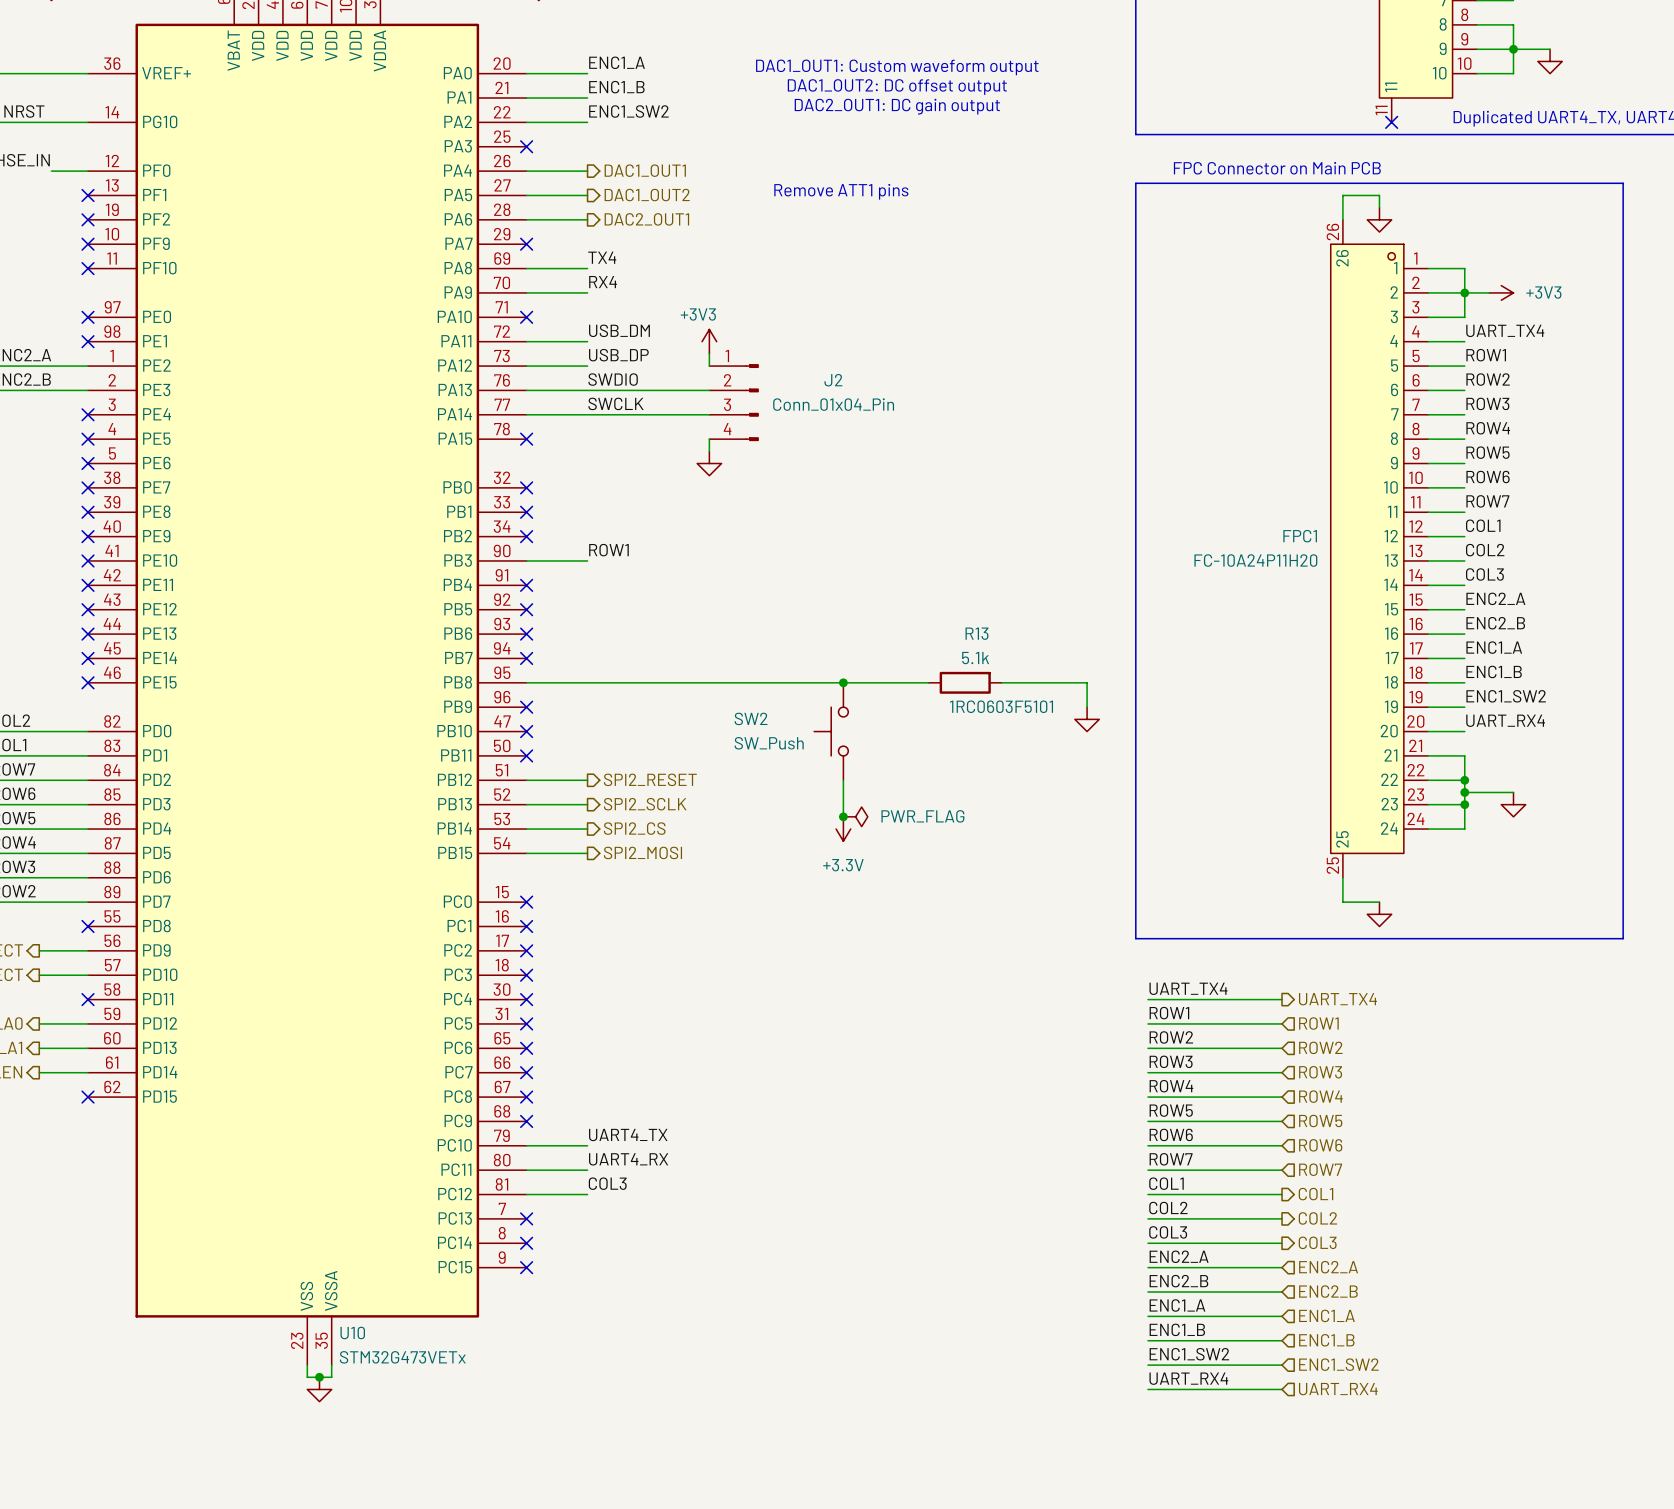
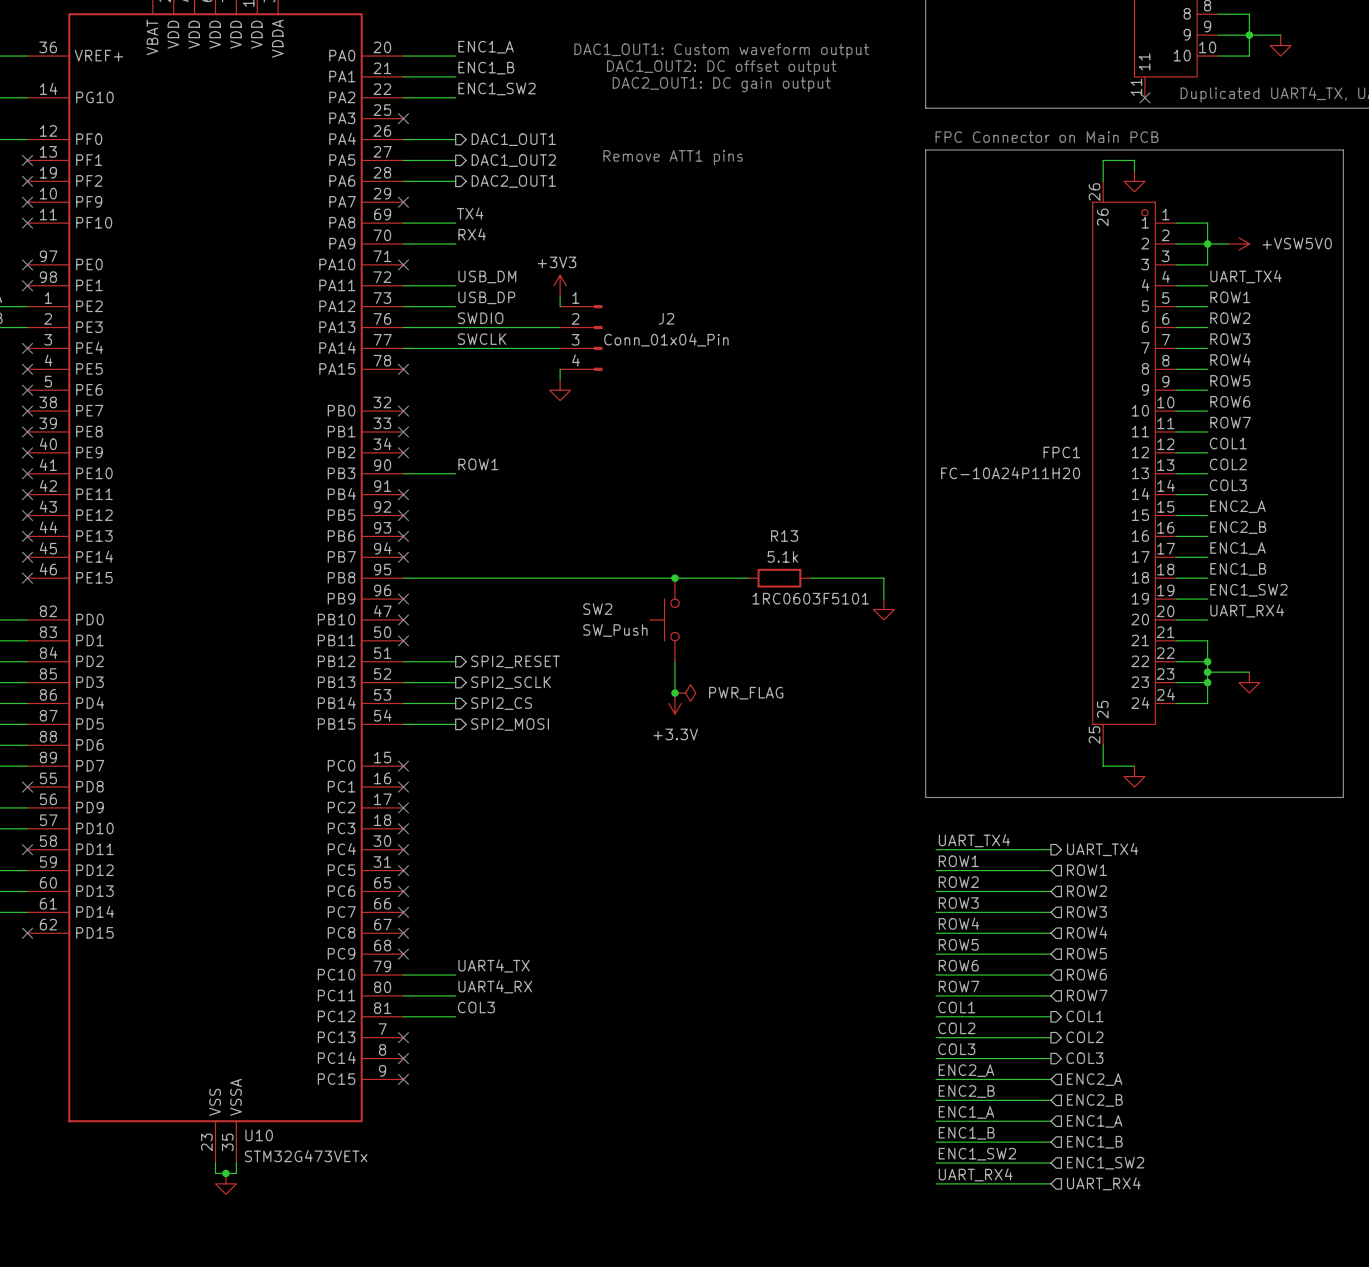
power symbol: +3V3 (1501, 292) -> +VSW5V0 (1238, 244)

